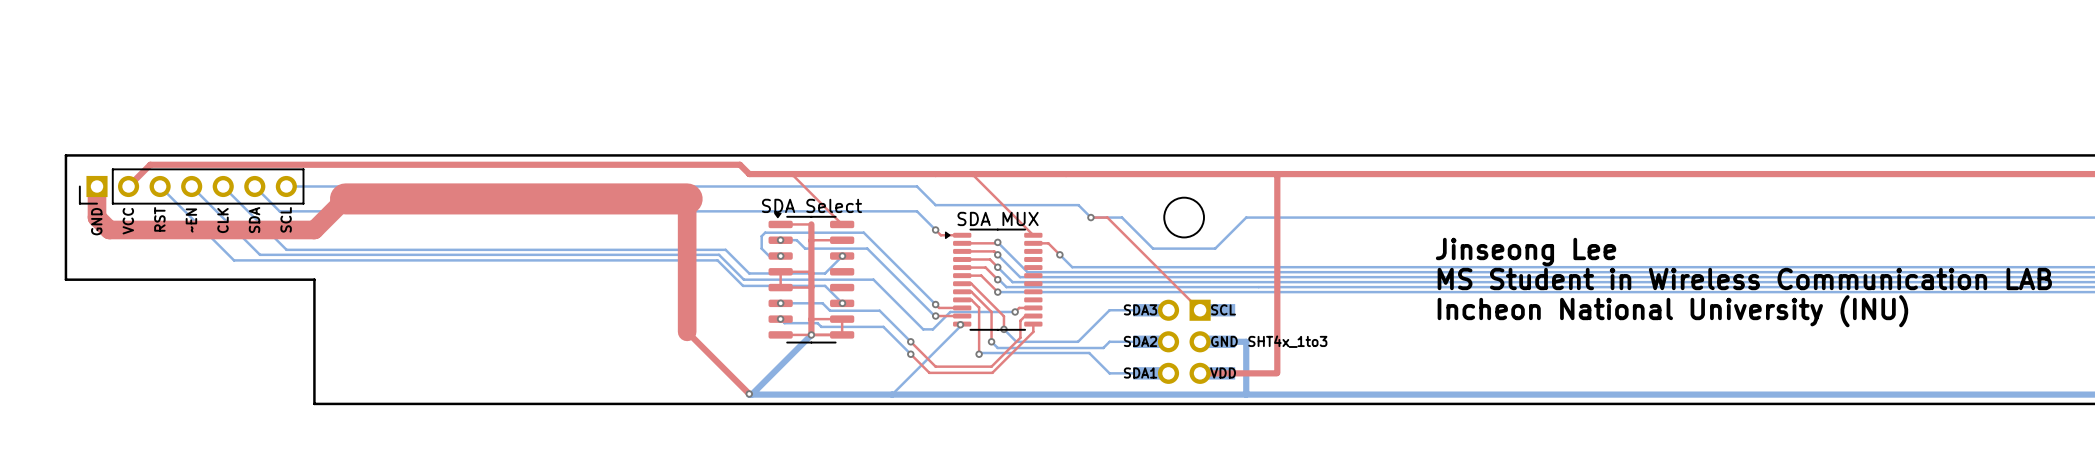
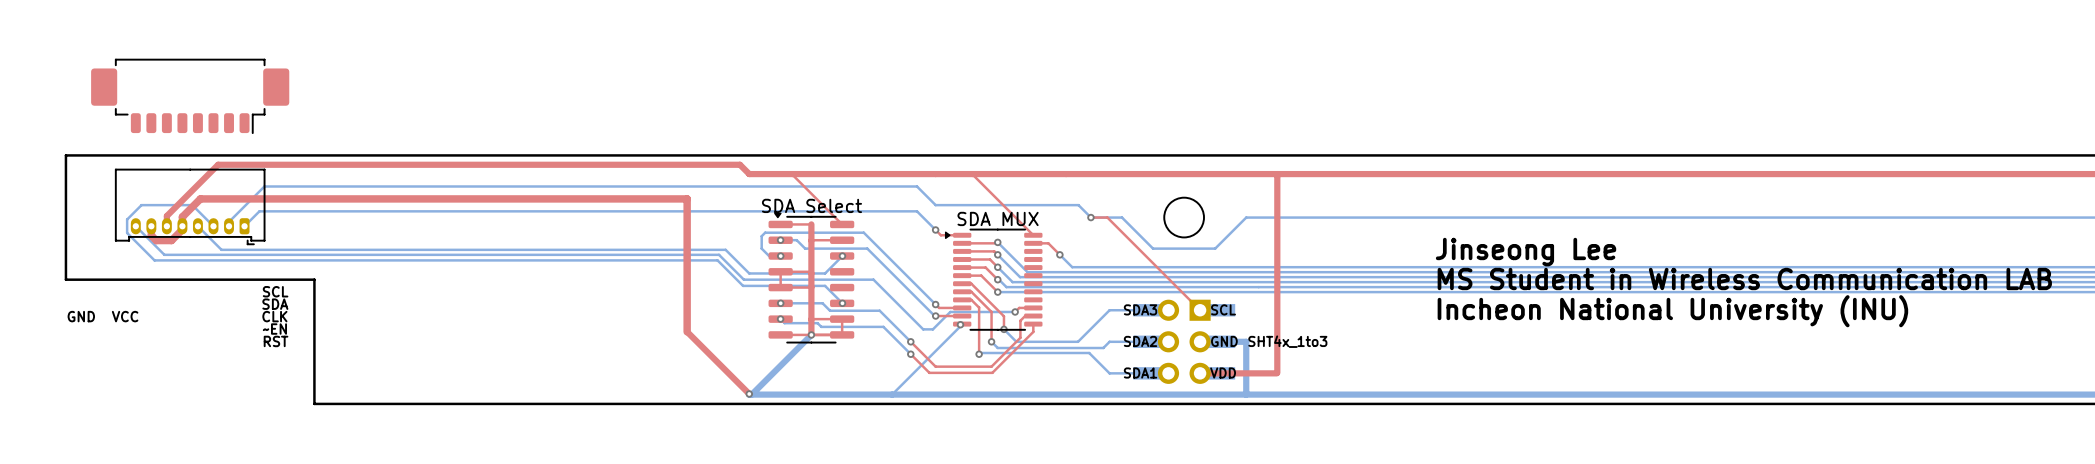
part: none -> (190, 96)
top track: (218, 164) (150, 164) (128, 186) -> (218, 164) (166, 216) (166, 226)
top track: (97, 186) (97, 217) (109, 229) (314, 229) (345, 198) -> (151, 226) (151, 235) (156, 240) (171, 240) (182, 229) (182, 216) (200, 198) (345, 198)
bottom track: (160, 186) (234, 260) -> (213, 226) (192, 205) (141, 205) (127, 219) (127, 232) (154, 260) (234, 260)
bottom track: (191, 186) (260, 254) -> (135, 226) (164, 254) (260, 254)
part: (191, 186) -> none
bottom track: (223, 186) (286, 249) -> (197, 226) (221, 249) (286, 249)
bottom track: (254, 186) (279, 211) -> (244, 226) (259, 211) (279, 211)
bottom track: none -> (286, 186) (264, 186) (229, 221) (229, 226)
top track width: thick (345, 198) (687, 198) (687, 331) -> thin (345, 198) (687, 198) (687, 331)
part: none -> (190, 206)
text rotation: 0° (159, 219) -> 90° clockwise (276, 341)
text position: RST (159, 219) -> RST (276, 341)
text rotation: 0° (286, 219) -> 90° clockwise (275, 291)
text position: SCL (286, 219) -> SCL (275, 291)
text rotation: 0° (191, 220) -> 90° clockwise (274, 329)
text position: ~EN (191, 220) -> ~EN (274, 329)
text rotation: 0° (222, 220) -> 90° clockwise (274, 316)
text position: CLK (222, 220) -> CLK (274, 316)
text rotation: 0° (254, 220) -> 90° clockwise (275, 304)
text position: SDA (254, 220) -> SDA (275, 304)
text rotation: 0° (96, 221) -> 90° clockwise (81, 316)
text position: GND (96, 221) -> GND (81, 316)
text rotation: 0° (128, 221) -> 90° clockwise (125, 316)
text position: VCC (128, 221) -> VCC (125, 316)

